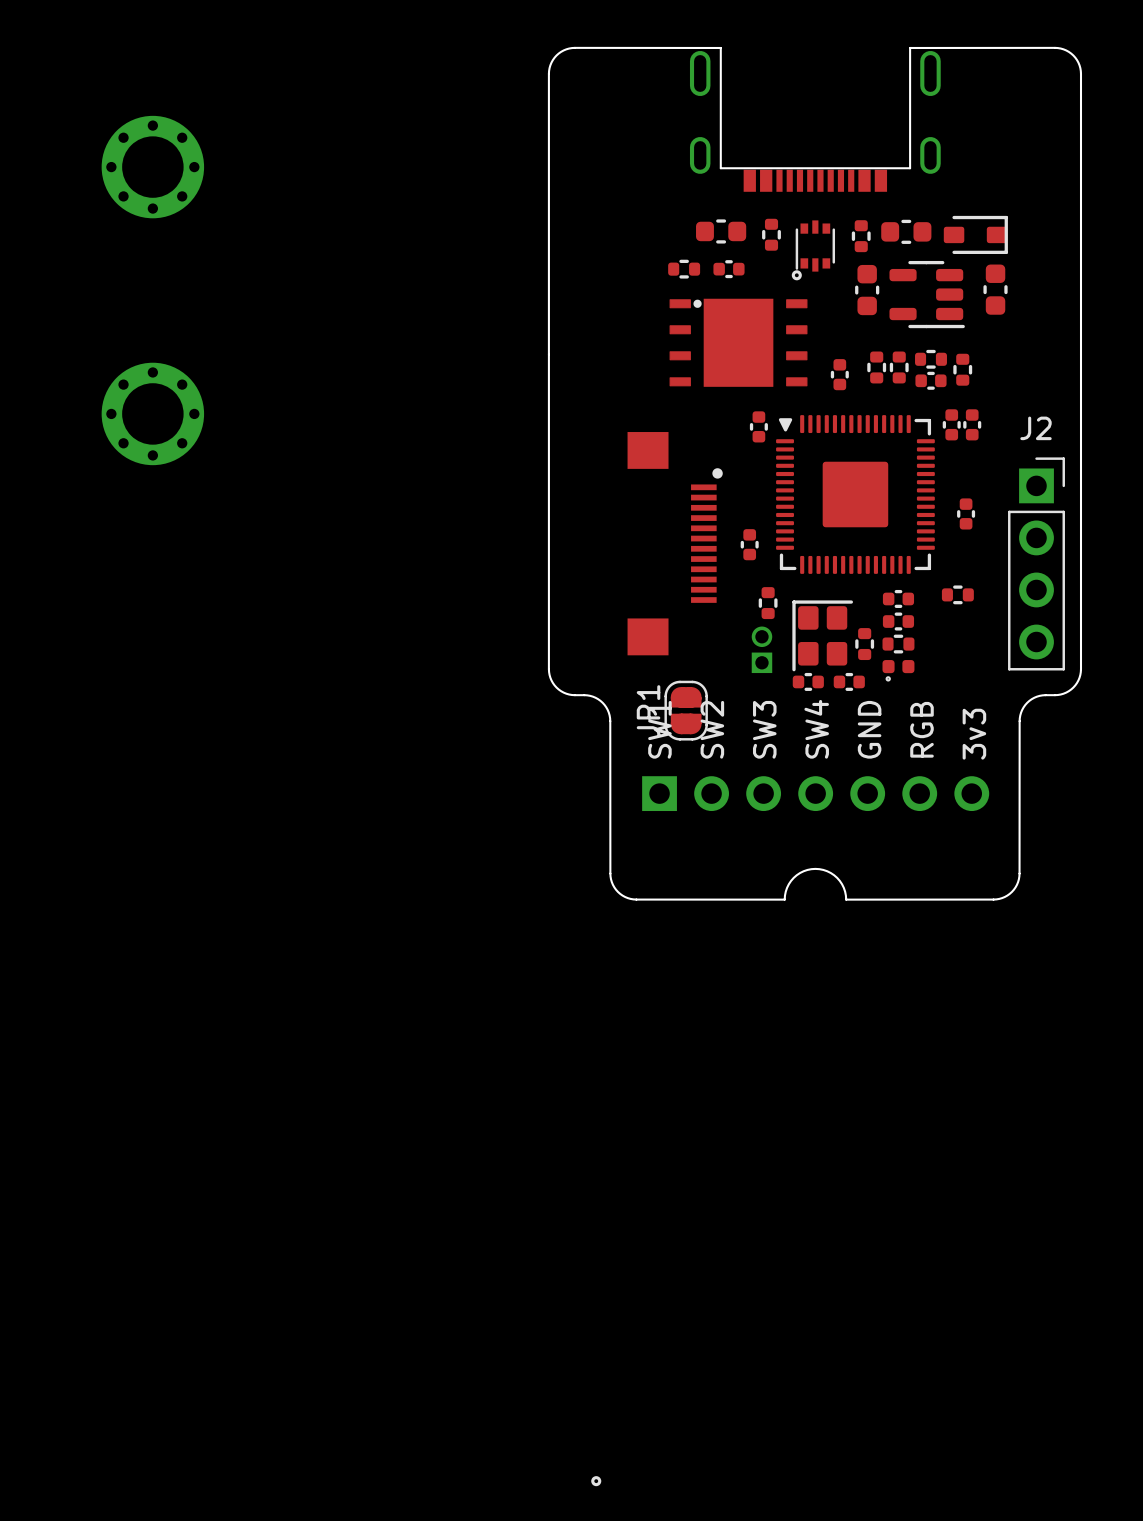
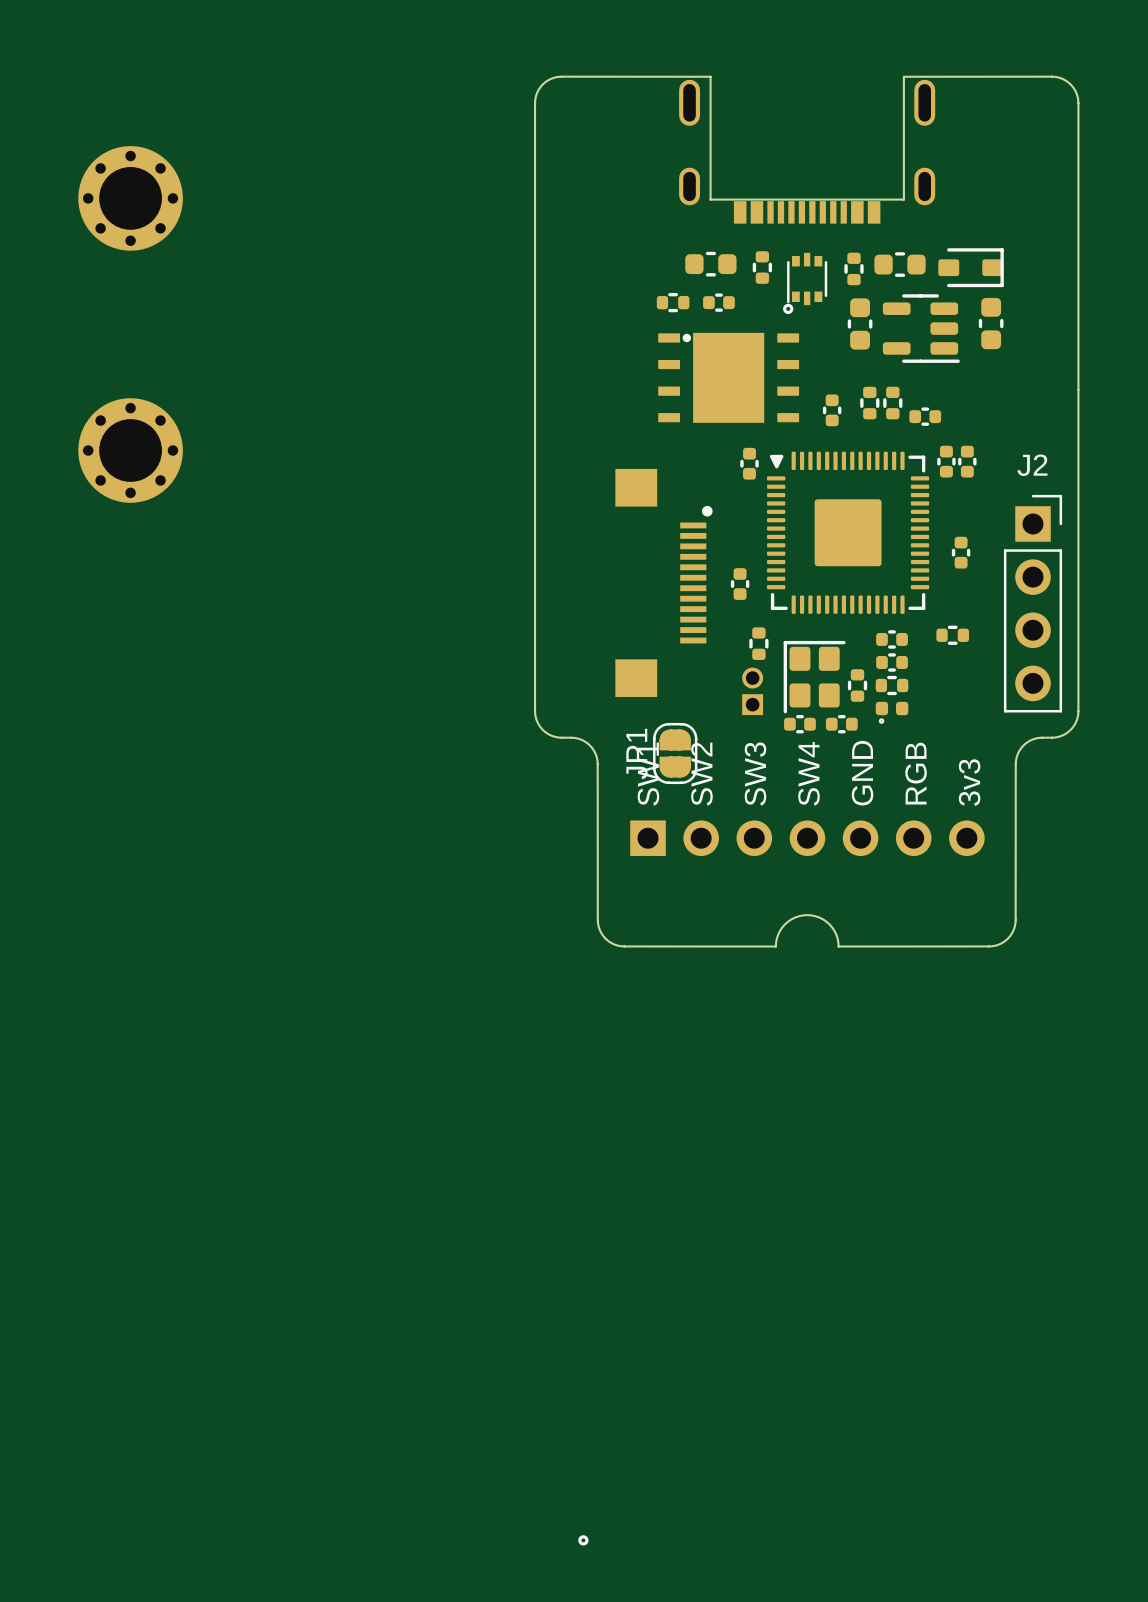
part: (930, 359) -> none
part: (962, 369) -> none

